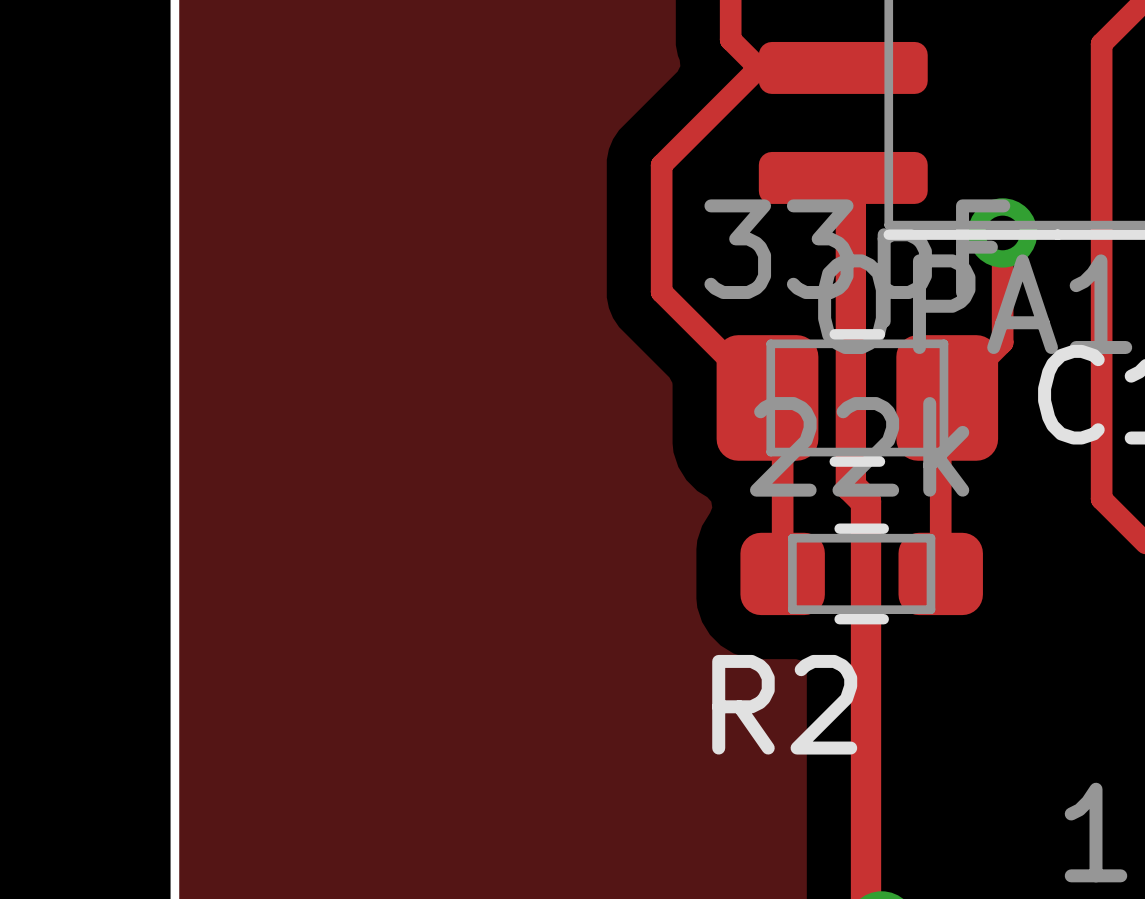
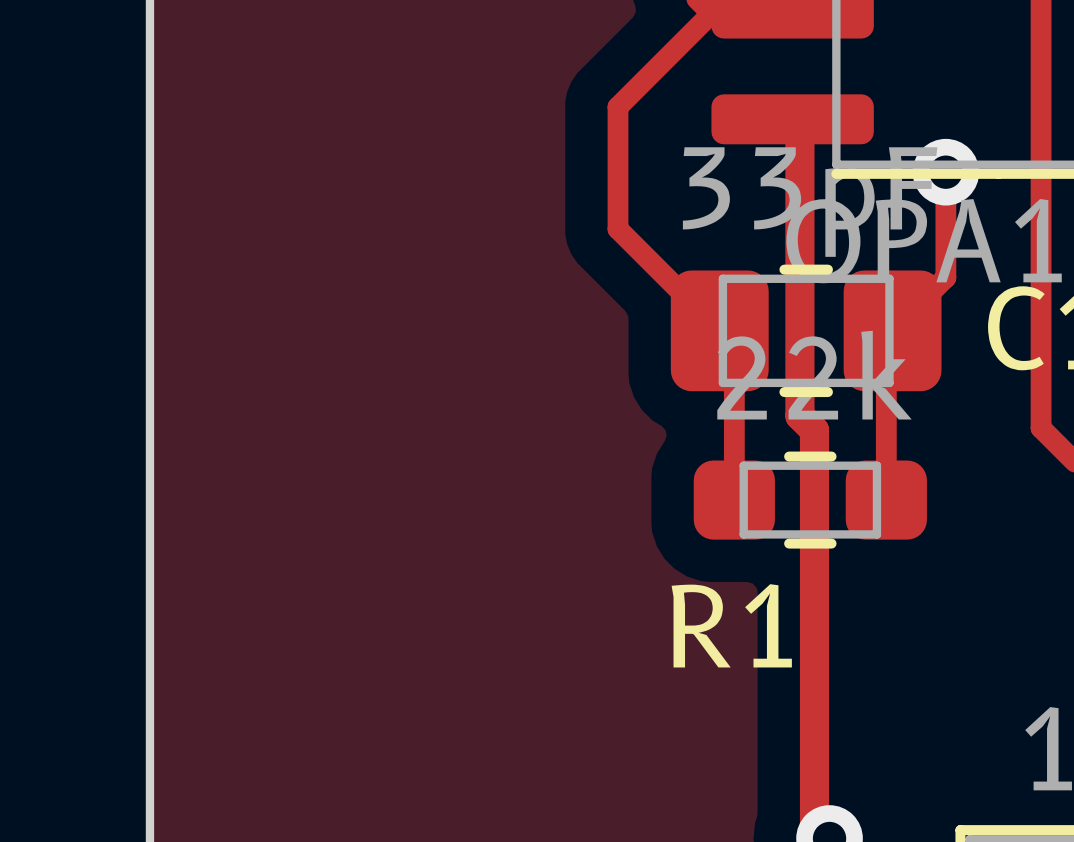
R2 name: R2 (784, 704) -> R1 (731, 625)

